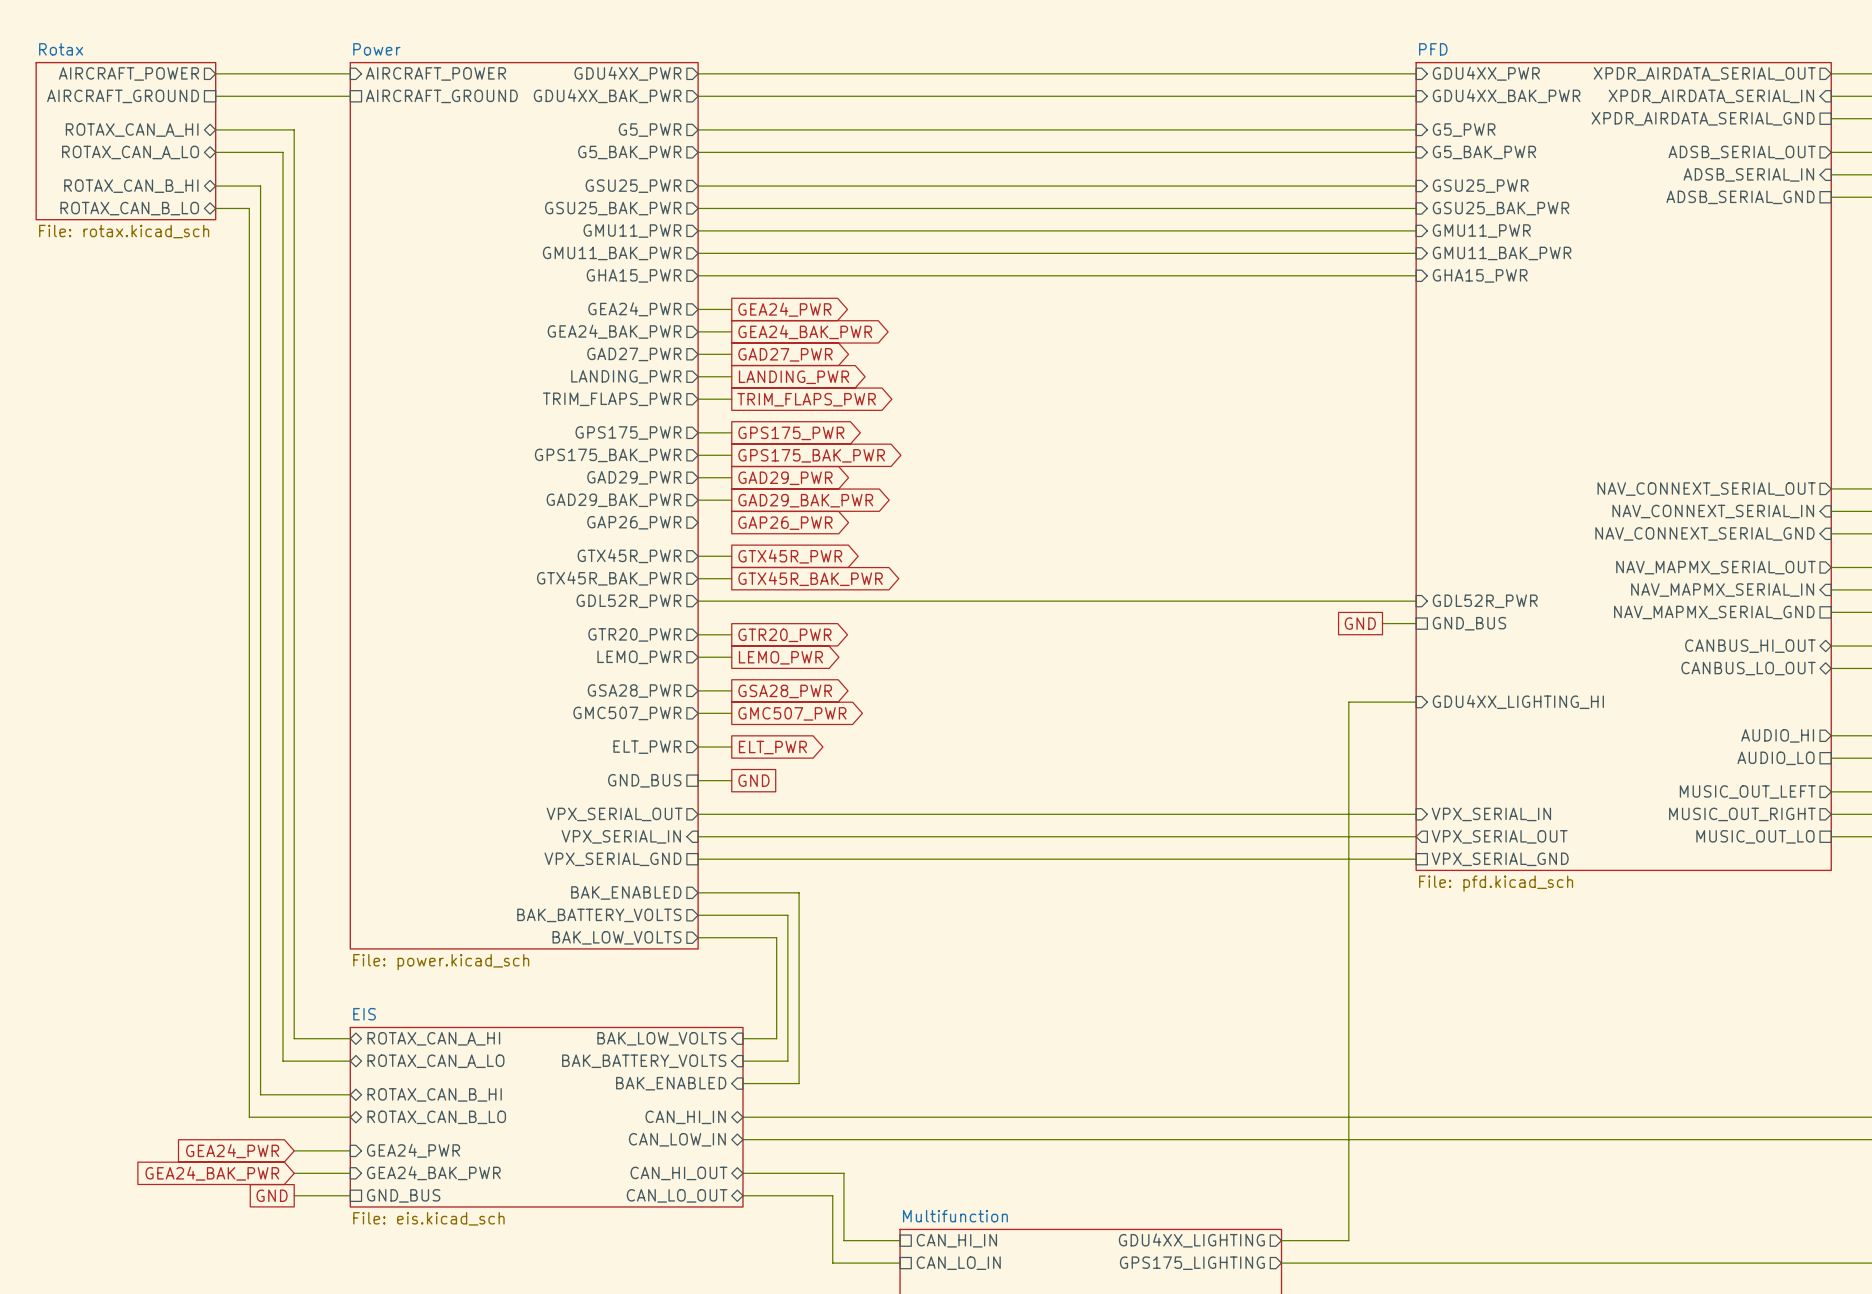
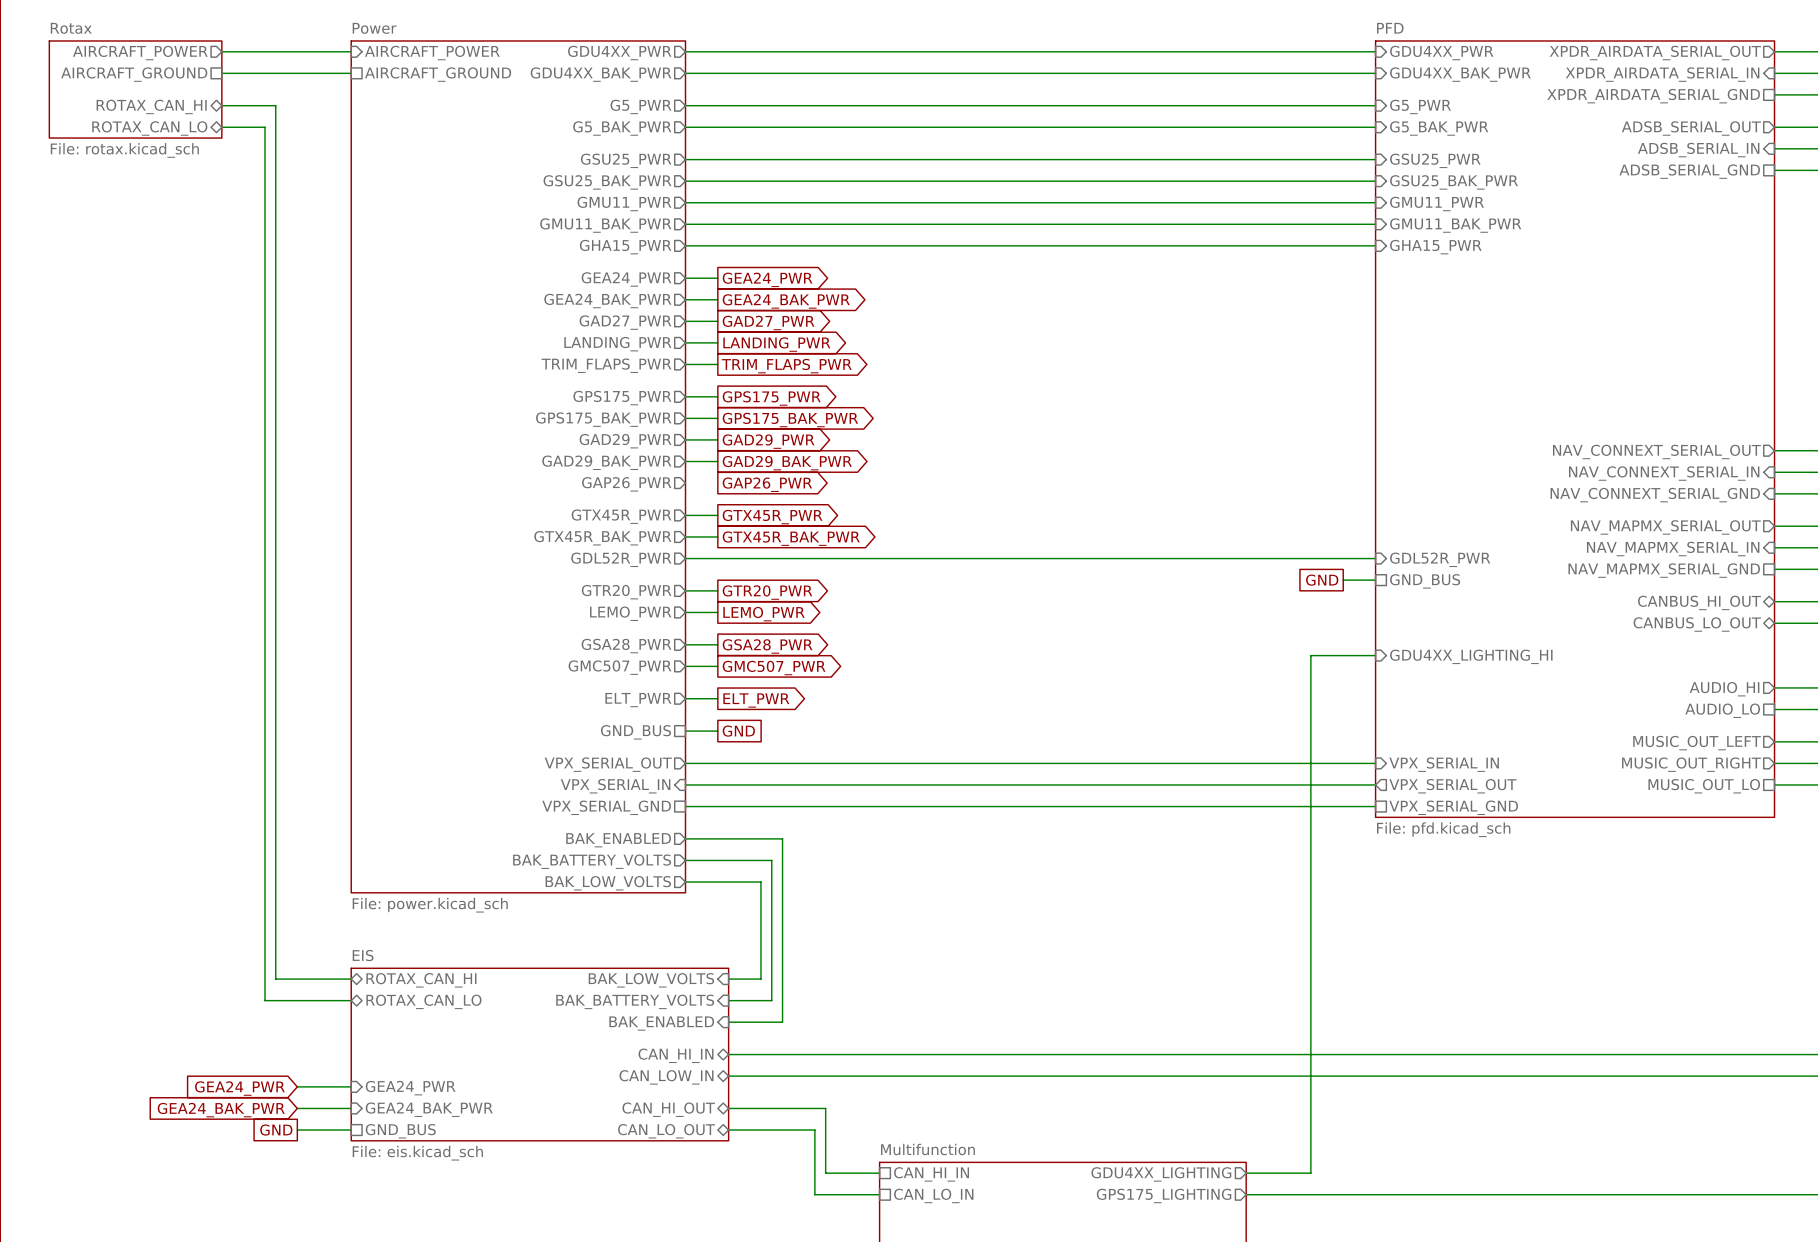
sheet Rotax: none -> File: rotax.kicad_sch (135, 89)
wire: (271, 129) (294, 129) (294, 1038) -> (275, 105) (275, 979) (297, 979)
sheet pin: ROTAX_CAN_A_HI (132, 130) -> ROTAX_CAN_HI (151, 106)
sheet Rotax: File: rotax.kicad_sch (125, 141) -> none
sheet pin: ROTAX_CAN_A_LO (130, 152) -> ROTAX_CAN_LO (149, 128)
wire: (260, 152) (283, 152) (283, 1061) -> none
sheet pin: ROTAX_CAN_B_HI (131, 186) -> none
wire: (215, 186) (260, 186) -> (264, 127) (264, 159)
sheet pin: ROTAX_CAN_B_LO (129, 208) -> none
wire: (215, 208) (249, 208) (249, 1117) (350, 1117) -> none
sheet pin: ROTAX_CAN_A_HI (433, 1038) -> ROTAX_CAN_HI (421, 980)
wire: (260, 1061) (260, 1094) (350, 1094) -> (264, 1000) (286, 1000)
sheet pin: ROTAX_CAN_A_LO (435, 1061) -> ROTAX_CAN_LO (423, 1001)
sheet pin: ROTAX_CAN_B_HI (434, 1094) -> none
sheet pin: ROTAX_CAN_B_LO (436, 1117) -> none

